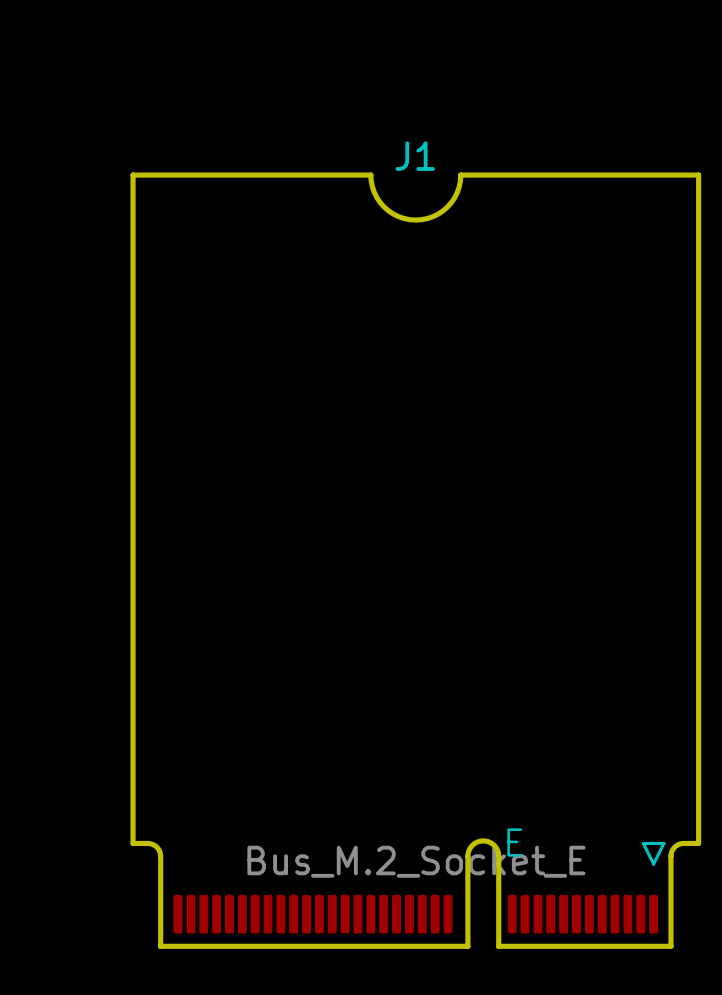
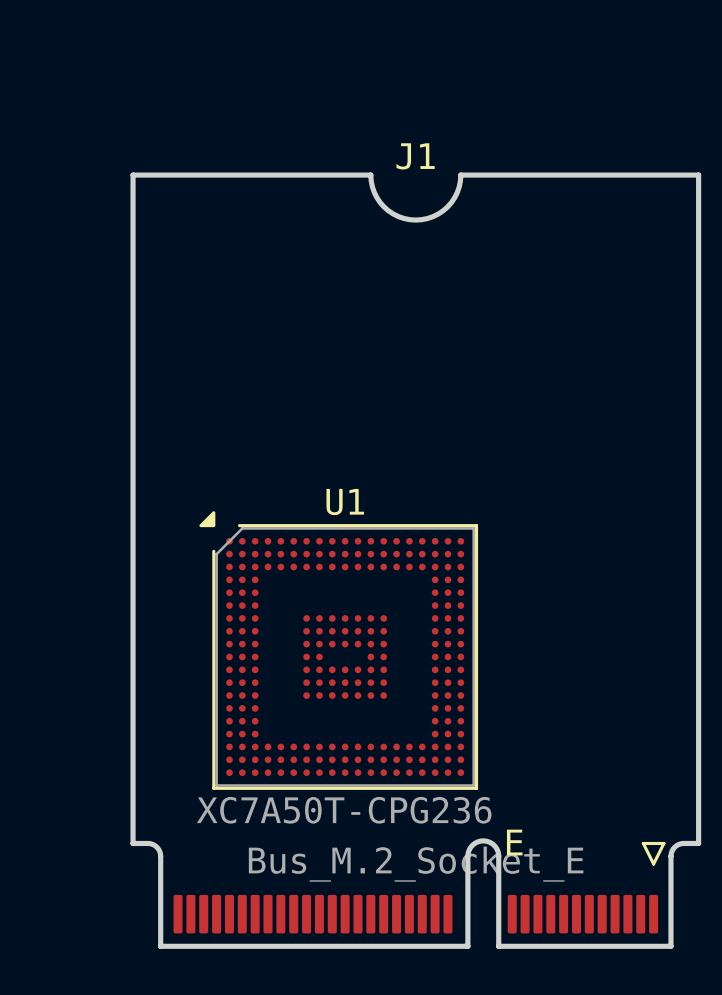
U1: none -> XC7A50T-CPG236 (338, 650)

